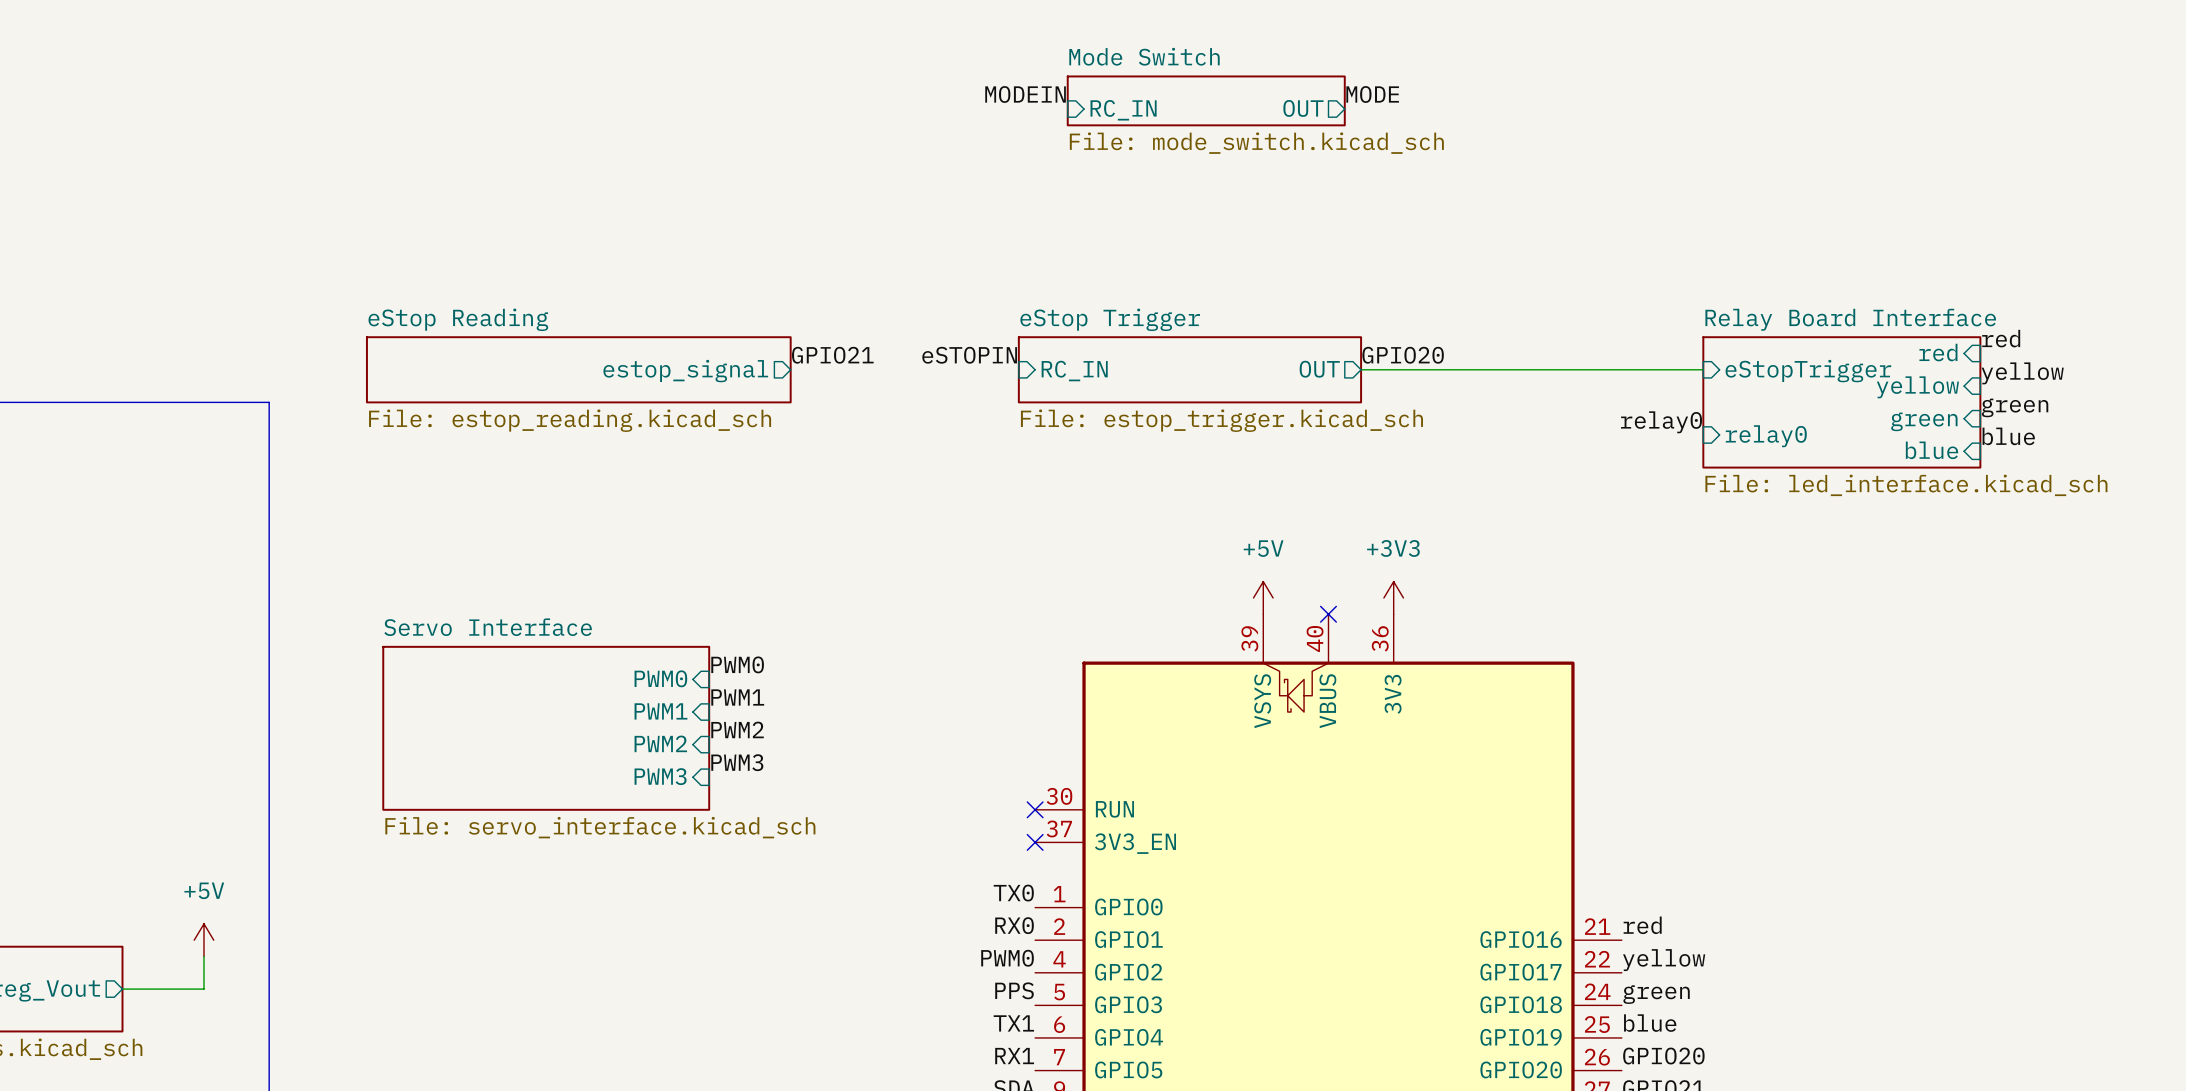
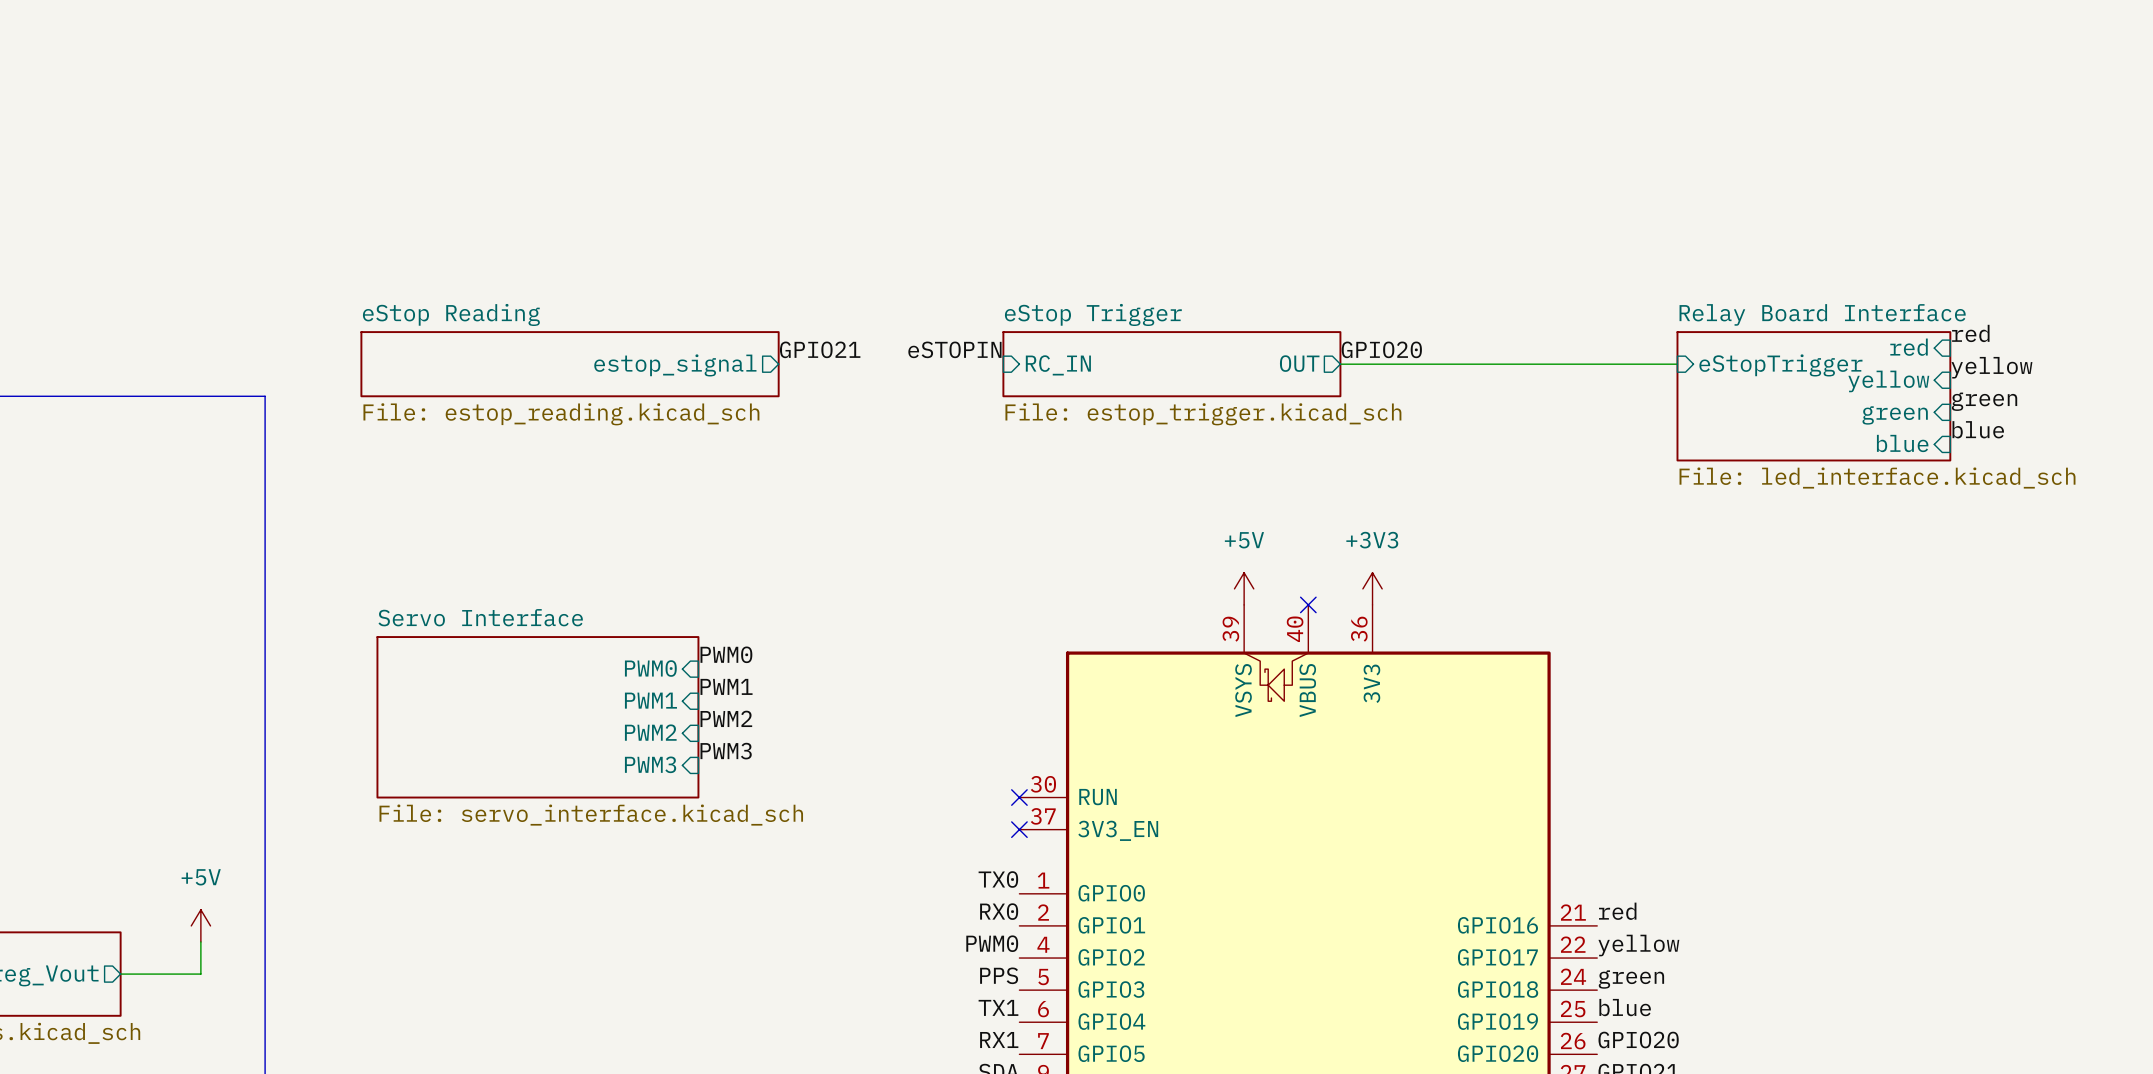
label: MODEIN (1025, 94) -> none
label: MODE (1372, 94) -> none
sheet Mode Switch: File: mode_switch.kicad_sch (1206, 100) -> none
sheet pin: OUT (1303, 108) -> none
sheet pin: RC_IN (1123, 110) -> none
label: relay0 (1661, 422) -> none
sheet pin: relay0 (1766, 436) -> none

